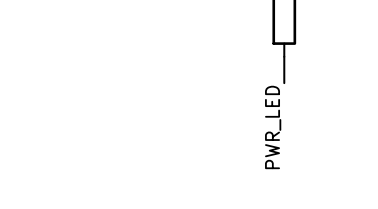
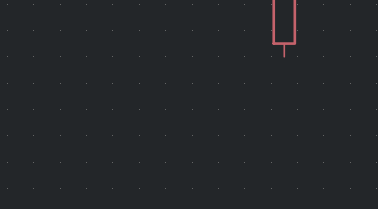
wire: (284, 56) (284, 83) -> none
label: PWR_LED (273, 127) -> none

